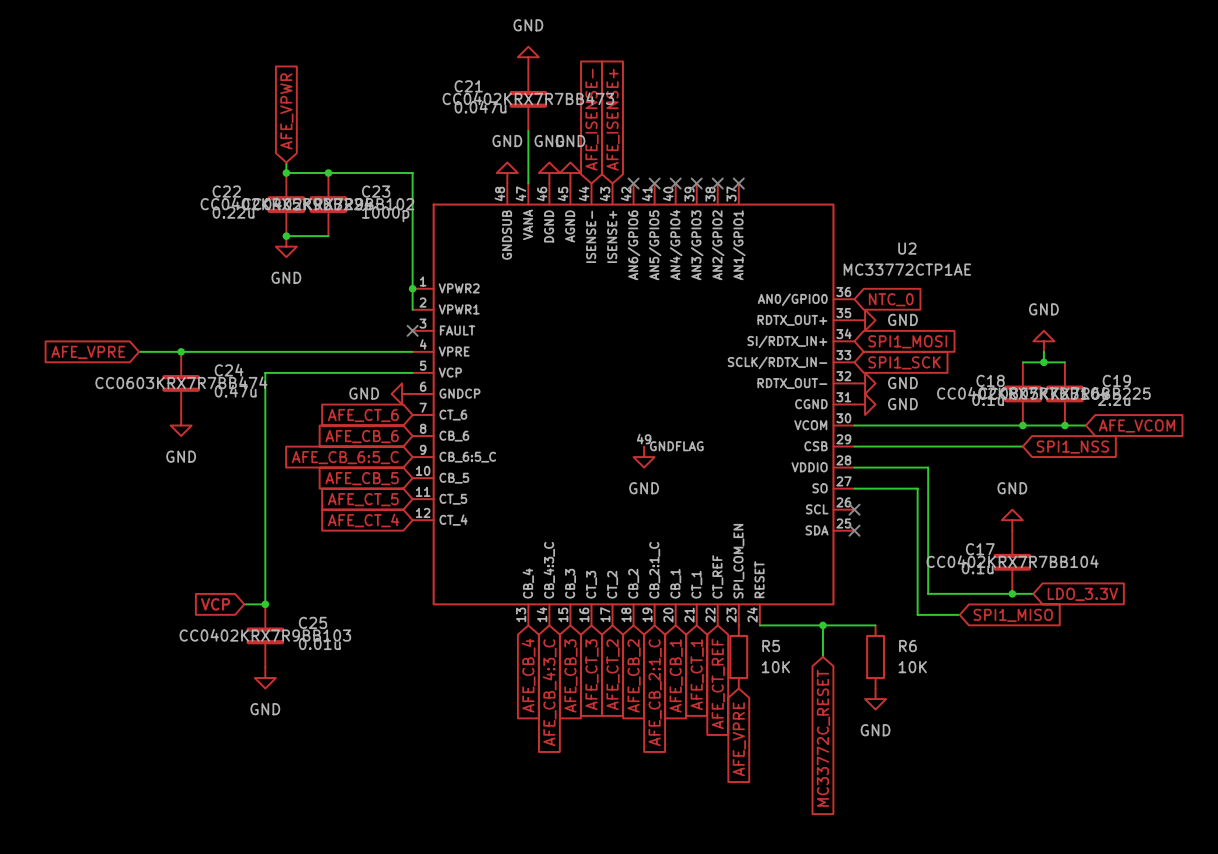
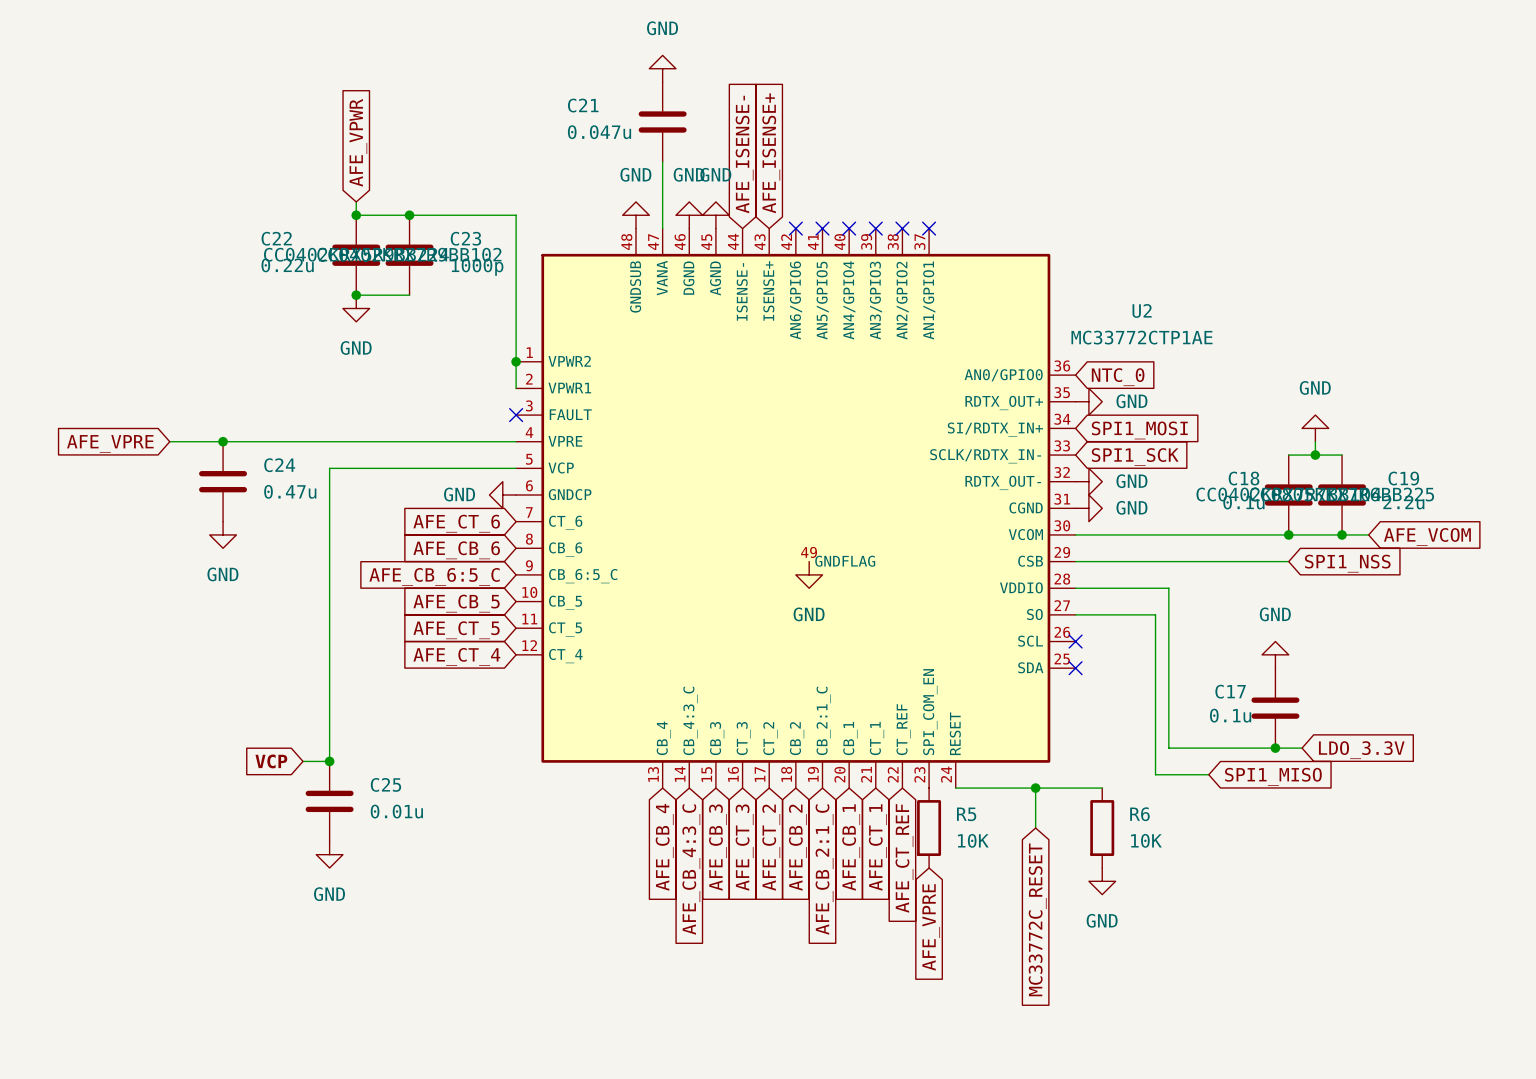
C21 text: CC0402KRX7R7BB473 (528, 98) -> none
C24 text: CC0603KRX7R7BB474 (181, 382) -> none
C17 text: CC0402KRX7R7BB104 (1012, 561) -> none
C25 text: CC0402KRX7R9BB103 (265, 635) -> none

